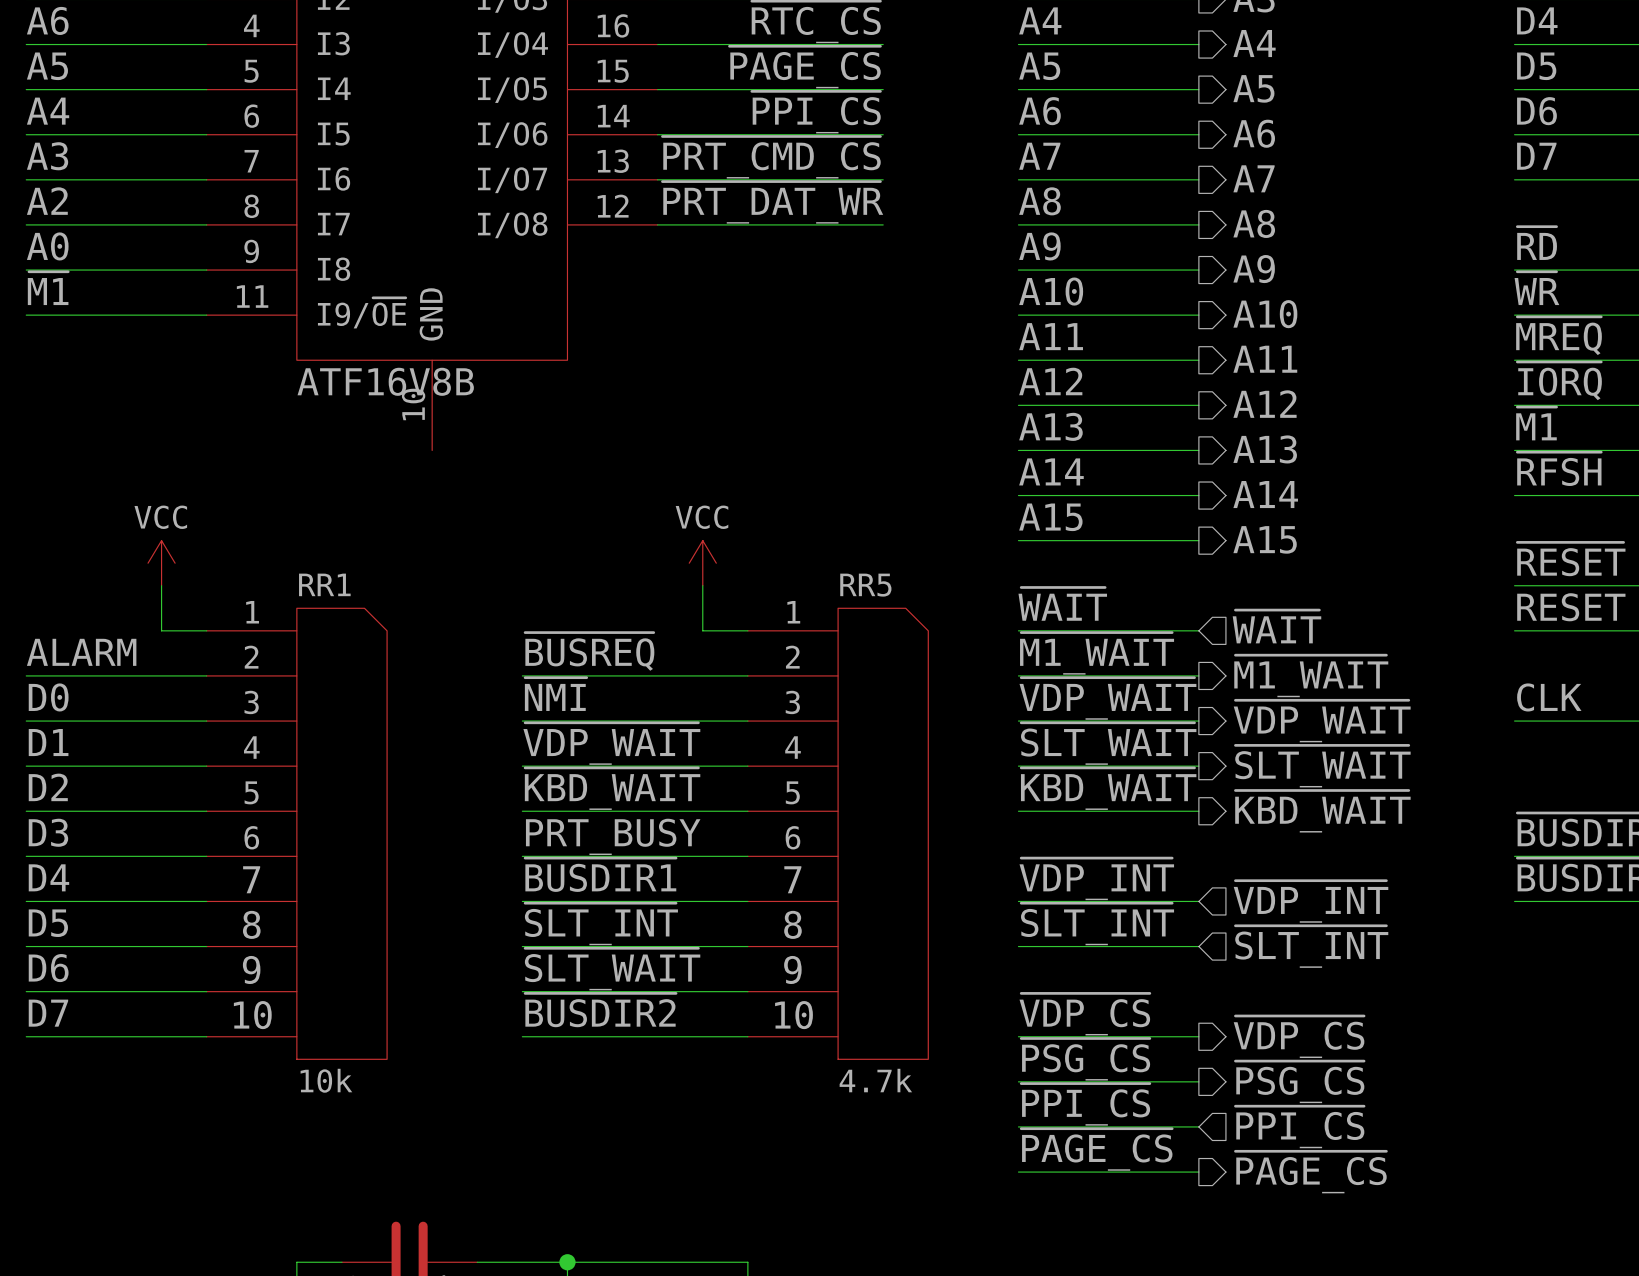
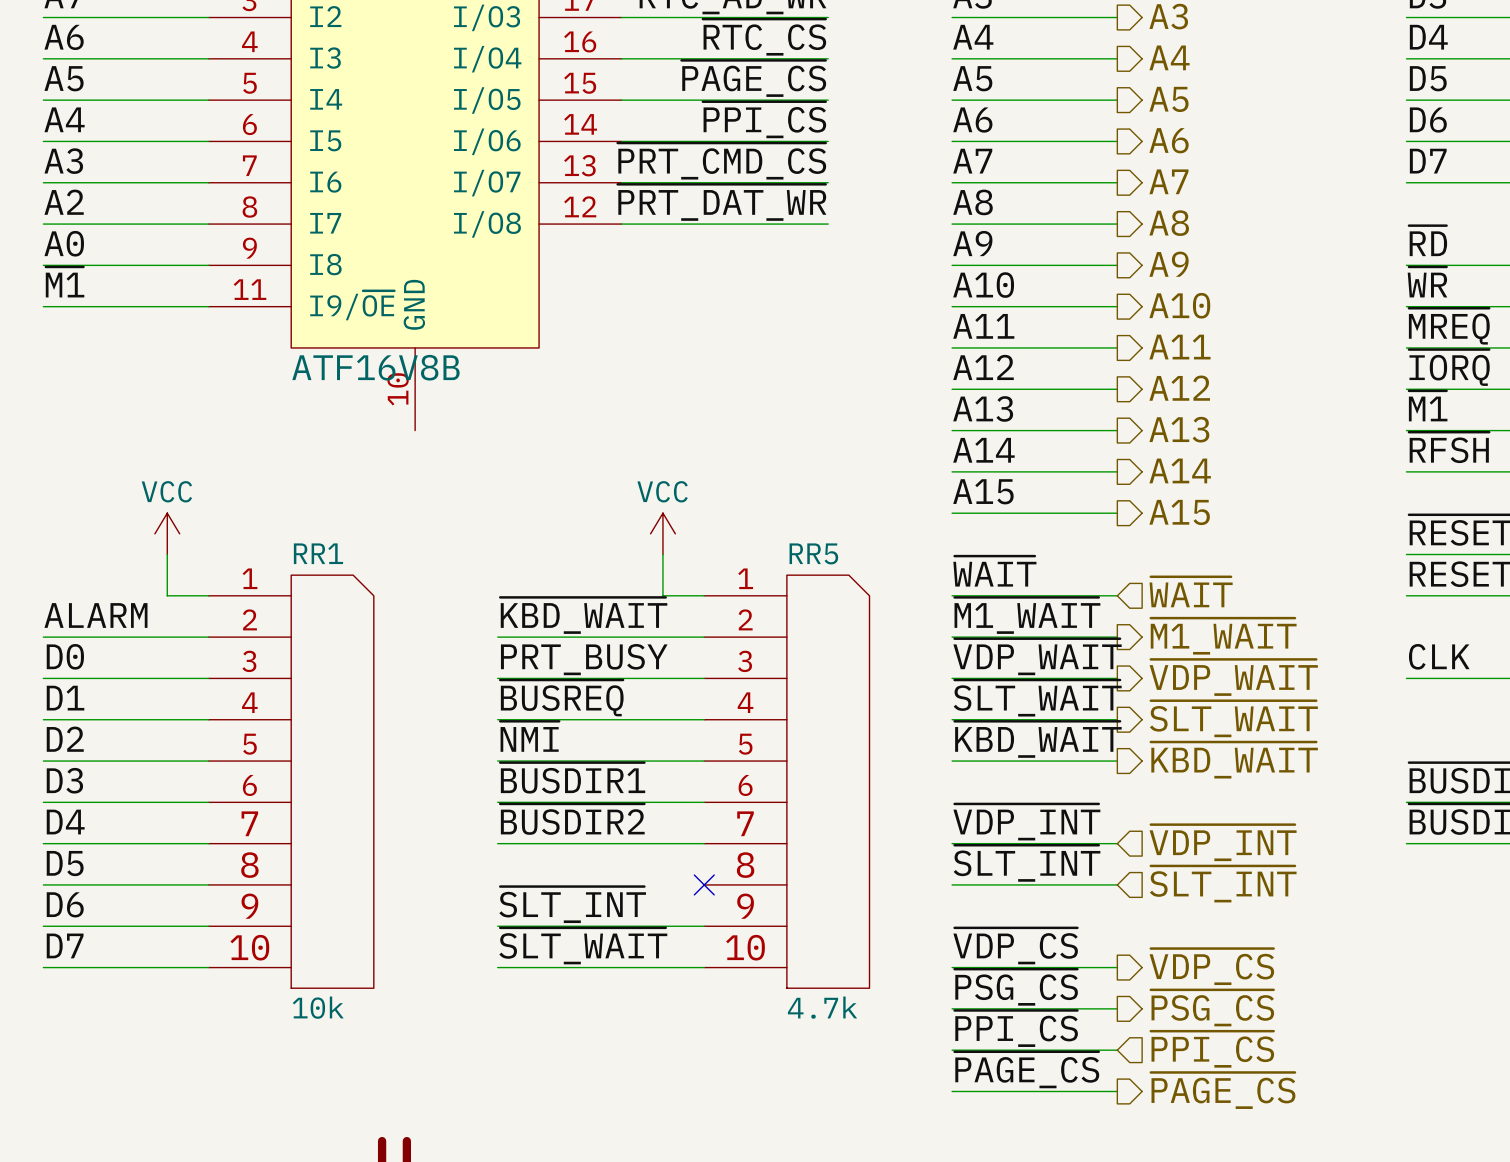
label: ~{BUSREQ} (589, 651) -> ~{KBD_WAIT} (583, 615)
label: ~{NMI} (555, 694) -> PRT_BUSY (584, 659)
label: ~{VDP_WAIT} (611, 743) -> ~{BUSREQ} (561, 698)
label: ~{KBD_WAIT} (612, 788) -> ~{NMI} (529, 736)
label: PRT_BUSY (613, 836) -> ~{BUSDIR1} (572, 778)
label: ~{BUSDIR1} (600, 874) -> ~{BUSDIR2} (572, 819)
label: ~{SLT_INT} (601, 924) -> none
wire: (522, 946) (747, 946) -> none
no-connect mark: none -> (704, 884)
label: ~{SLT_WAIT} (612, 969) -> ~{SLT_INT} (572, 904)
label: ~{BUSDIR2} (600, 1010) -> ~{SLT_WAIT} (583, 946)

